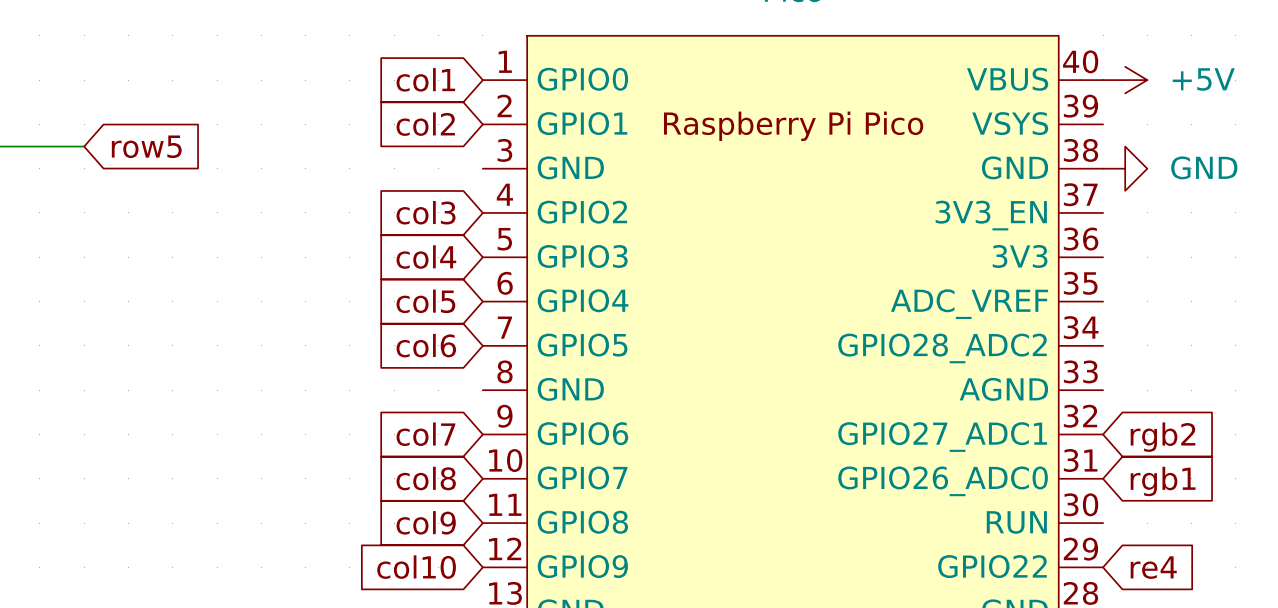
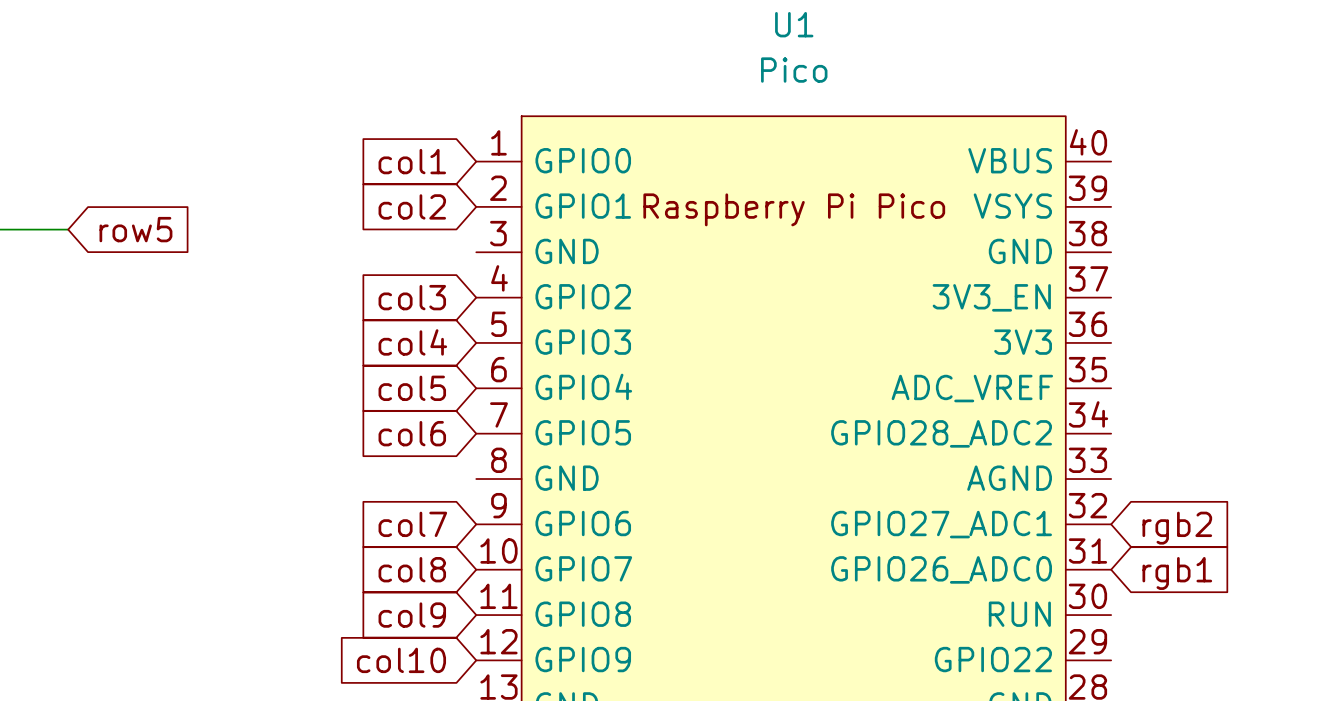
power symbol: +5V (1125, 80) -> none
power symbol: GND (1125, 168) -> none
global label: re4 (1153, 567) -> none

